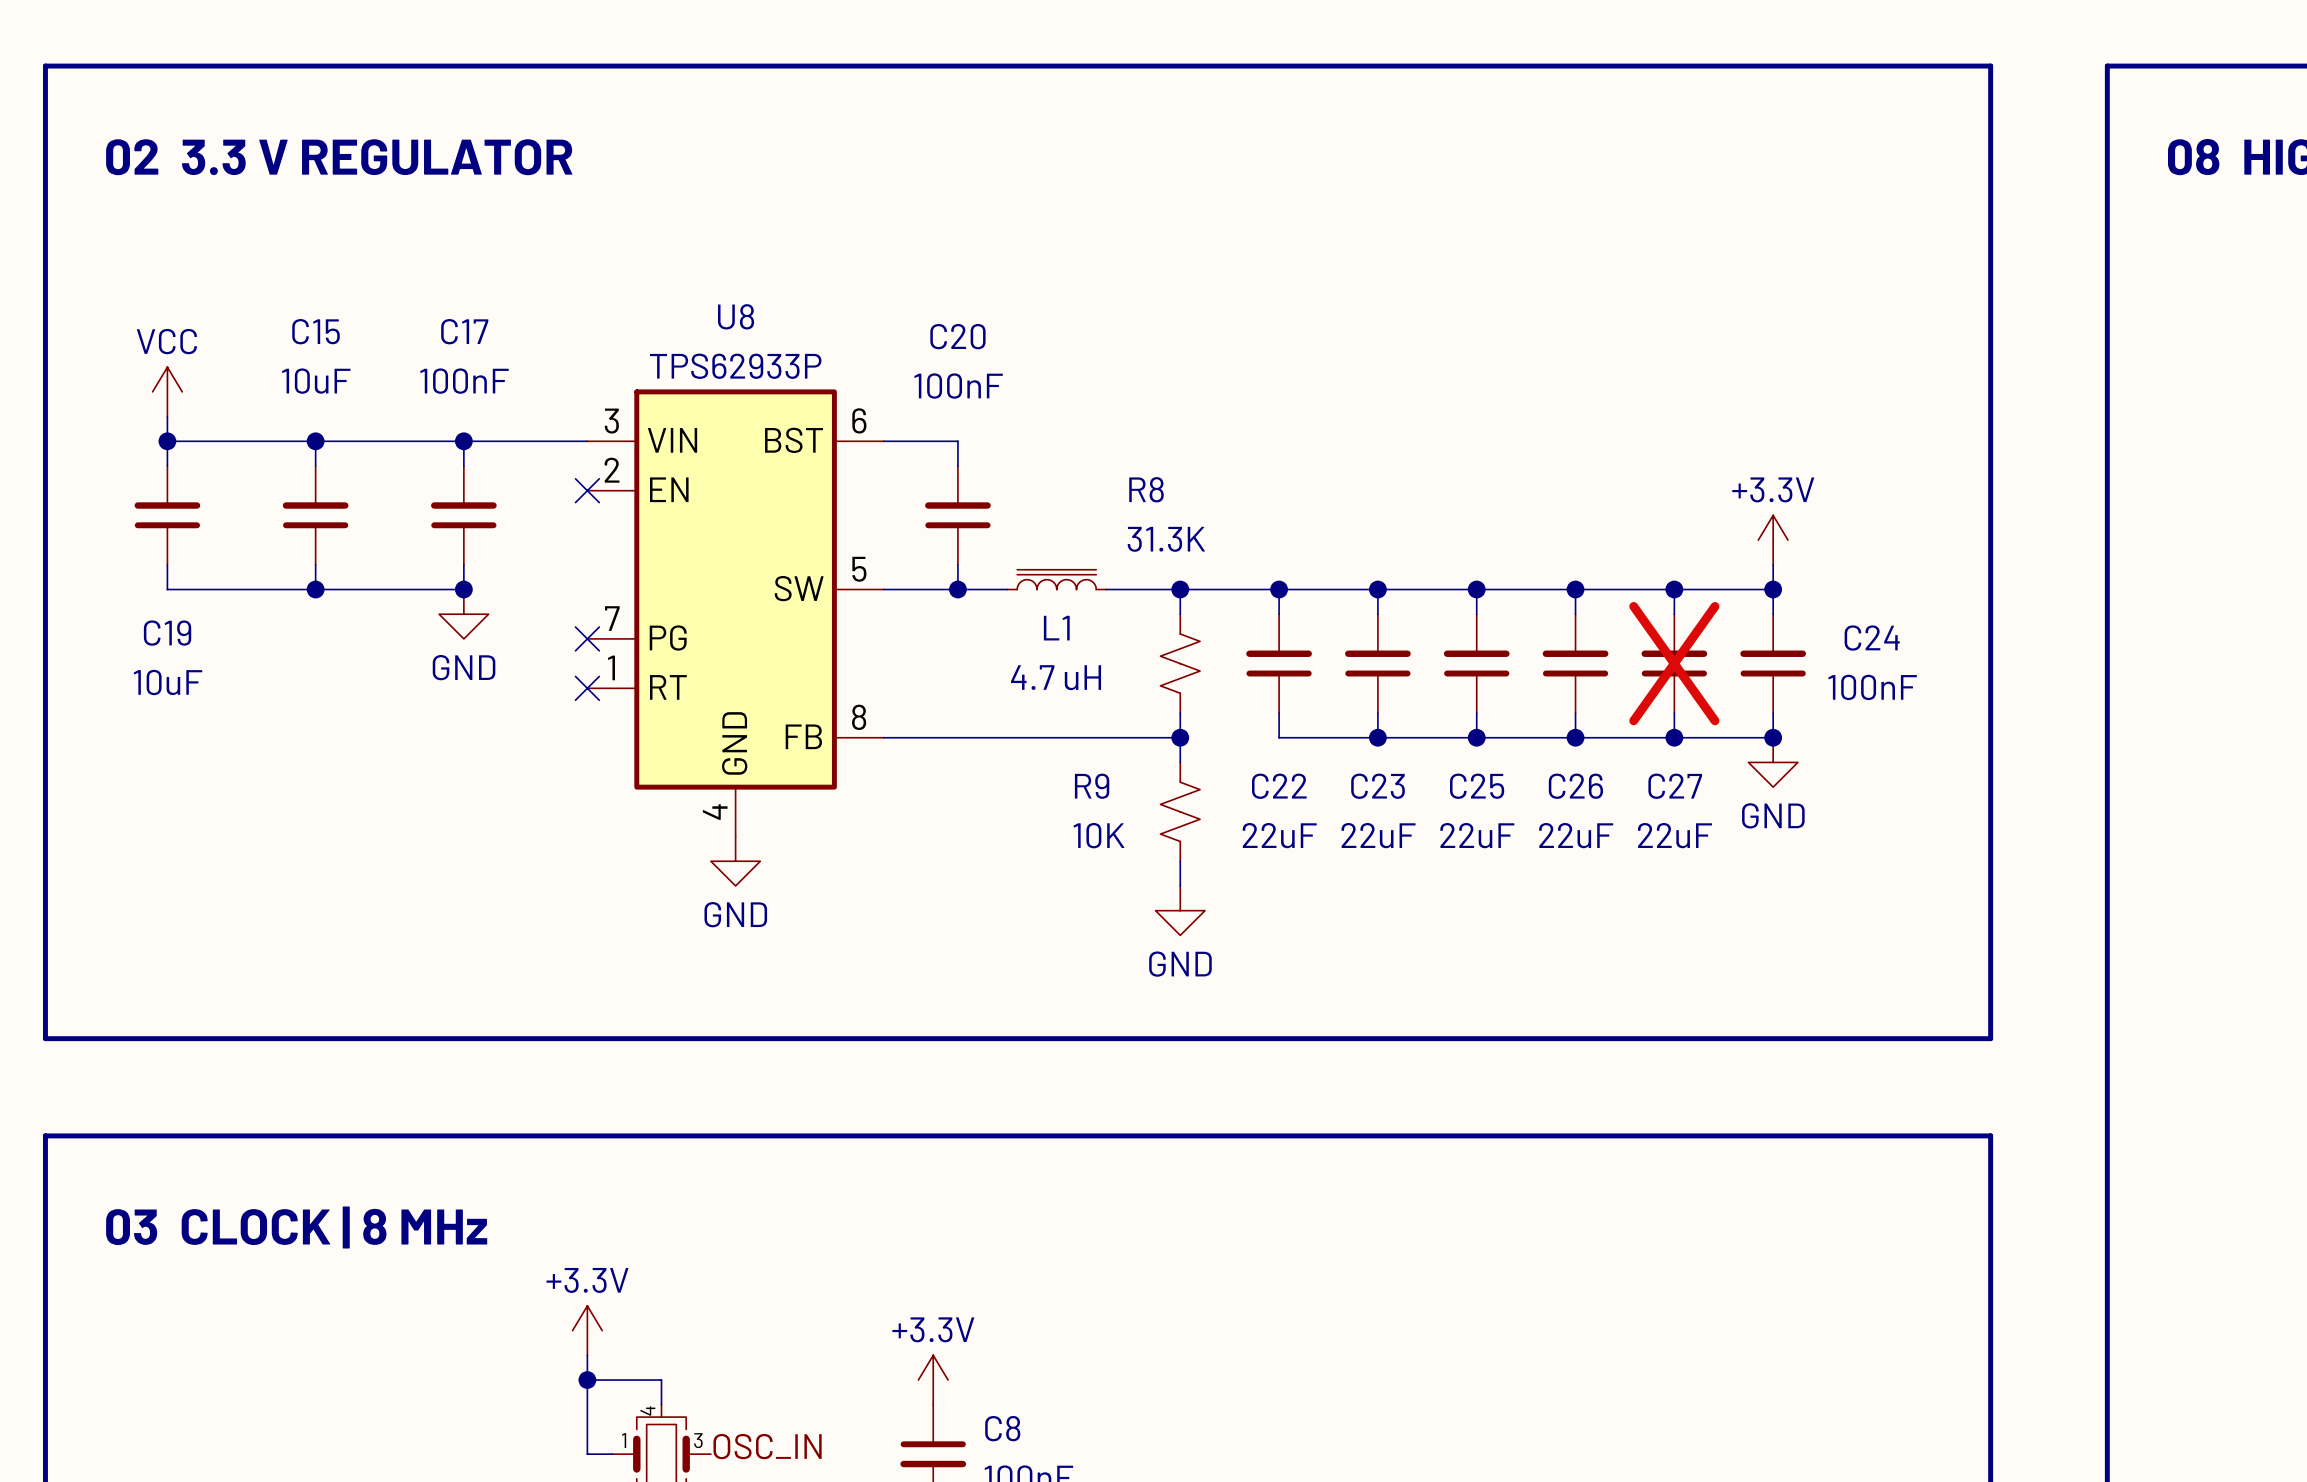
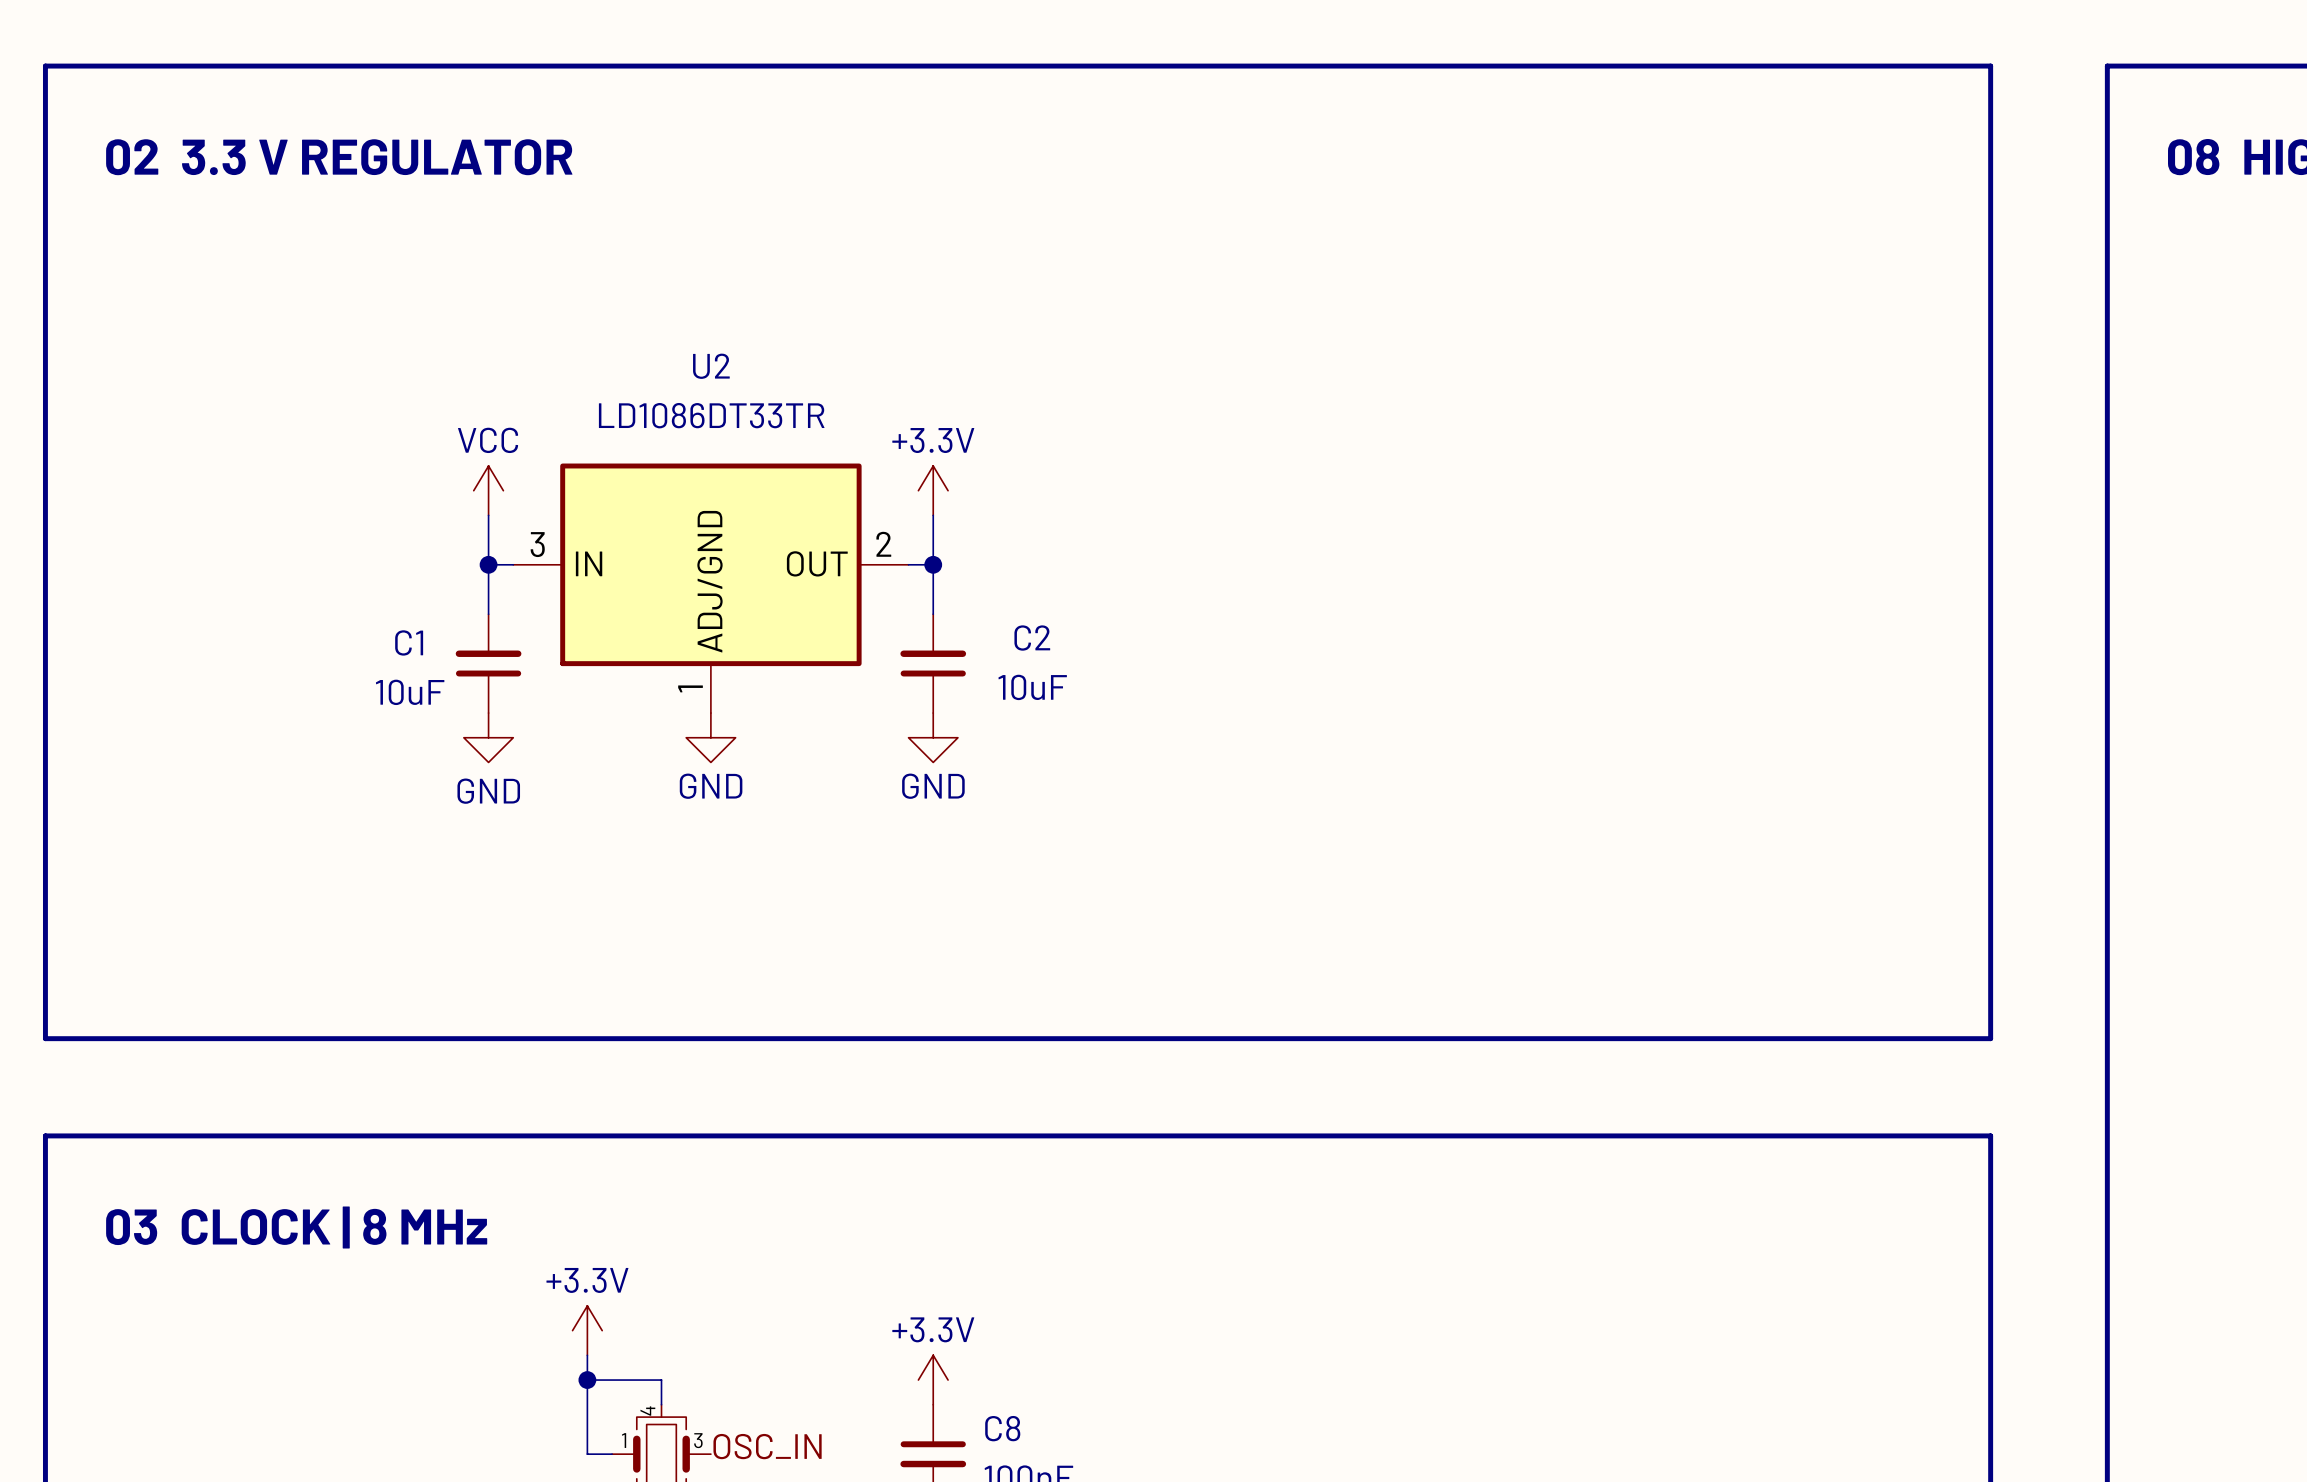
power symbol position: VCC (167, 391) -> VCC (488, 490)
wire: (167, 416) (167, 465) -> none
wire: (167, 441) (587, 441) -> none
junction: (167, 441) -> none
wire: (315, 441) (315, 465) -> none
junction: (315, 441) -> none
wire: (463, 441) (463, 465) -> none
junction: (463, 441) -> none
wire: (883, 441) (957, 441) (957, 465) -> none
no-connect mark: (587, 490) -> none
power symbol: none -> +3.3V (933, 490)
C19: 10uF (167, 515) -> none
C15: 10uF (315, 515) -> none
C17: 100nF (463, 515) -> none
wire: none -> (488, 515) (488, 614)
wire: none -> (933, 515) (933, 614)
C20: 100nF (957, 515) -> none
power symbol: +3.3V (1773, 540) -> none
wire: (167, 564) (167, 589) (463, 589) (463, 564) -> none
wire: (315, 564) (315, 589) -> none
wire: none -> (488, 564) (513, 564)
wire: none -> (908, 564) (933, 564)
wire: (957, 564) (957, 589) -> none
wire: (1773, 564) (1773, 614) -> none
L1: 4.7 uH (1056, 579) -> none
U2: none -> LD1086DT33TR (710, 588)
junction: (315, 589) -> none
junction position: (463, 589) -> (488, 564)
wire: (883, 589) (1007, 589) -> none
junction position: (957, 589) -> (933, 564)
wire: (1106, 589) (1773, 589) -> none
wire: (1180, 589) (1180, 614) -> none
junction: (1180, 589) -> none
wire: (1279, 589) (1279, 614) -> none
junction: (1279, 589) -> none
wire: (1377, 589) (1377, 614) -> none
junction: (1377, 589) -> none
wire: (1476, 589) (1476, 614) -> none
junction: (1476, 589) -> none
wire: (1575, 589) (1575, 614) -> none
junction: (1575, 589) -> none
wire: (1674, 589) (1674, 614) -> none
junction: (1674, 589) -> none
junction: (1773, 589) -> none
U8: TPS62933P (735, 612) -> none
power symbol position: GND (463, 614) -> GND (488, 737)
no-connect mark: (587, 638) -> none
C1: none -> 10uF (488, 663)
C2: none -> 10uF (933, 663)
R8: 31.3K (1180, 663) -> none
C22: 22uF (1279, 663) -> none
C23: 22uF (1377, 663) -> none
C25: 22uF (1476, 663) -> none
C26: 22uF (1575, 663) -> none
C27: 22uF (1674, 663) -> none
C24: 100nF (1773, 663) -> none
no-connect mark: (587, 688) -> none
wire: (1180, 713) (1180, 762) -> none
wire: (1279, 713) (1279, 737) (1773, 737) (1773, 713) -> none
wire: (1377, 713) (1377, 737) -> none
wire: (1476, 713) (1476, 737) -> none
wire: (1575, 713) (1575, 737) -> none
wire: (1674, 713) (1674, 737) -> none
power symbol: none -> GND (710, 737)
wire: (883, 737) (1180, 737) -> none
power symbol: none -> GND (933, 737)
junction: (1180, 737) -> none
junction: (1377, 737) -> none
junction: (1476, 737) -> none
junction: (1575, 737) -> none
junction: (1674, 737) -> none
junction: (1773, 737) -> none
power symbol: GND (1773, 762) -> none
R9: 10K (1180, 811) -> none
power symbol: GND (735, 861) -> none
wire: (1180, 861) (1180, 885) -> none
power symbol: GND (1180, 910) -> none

